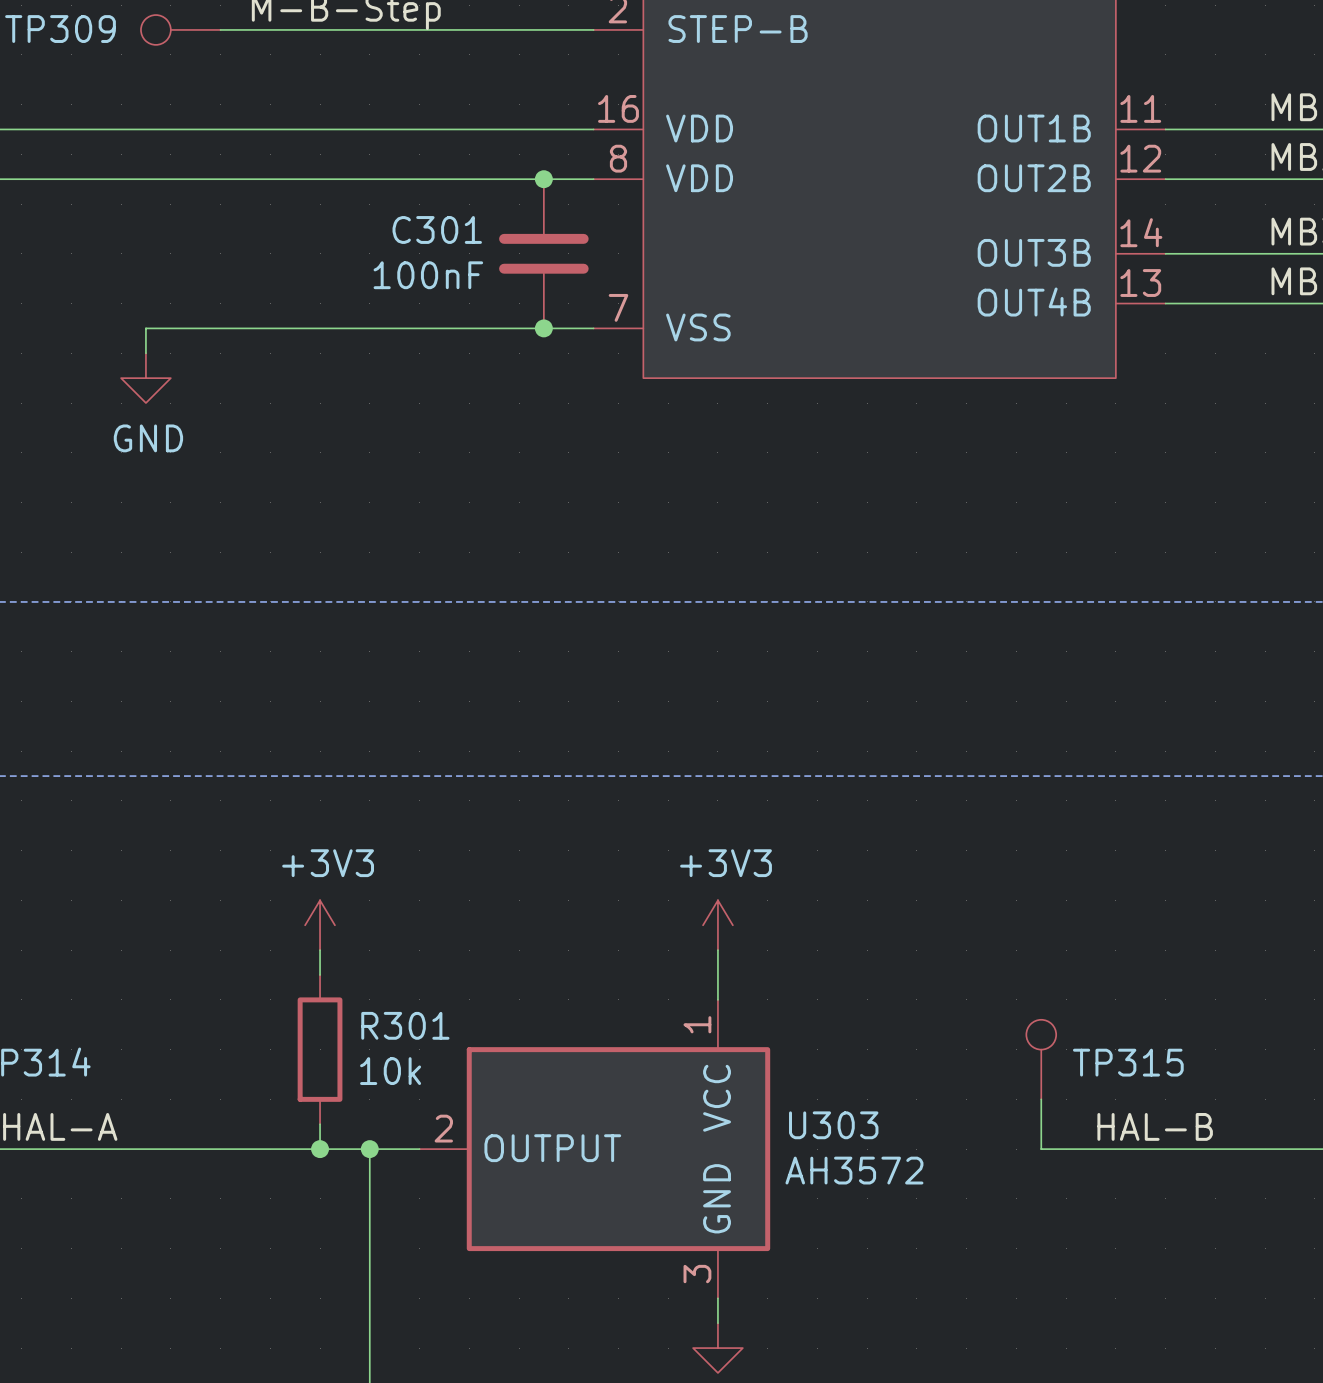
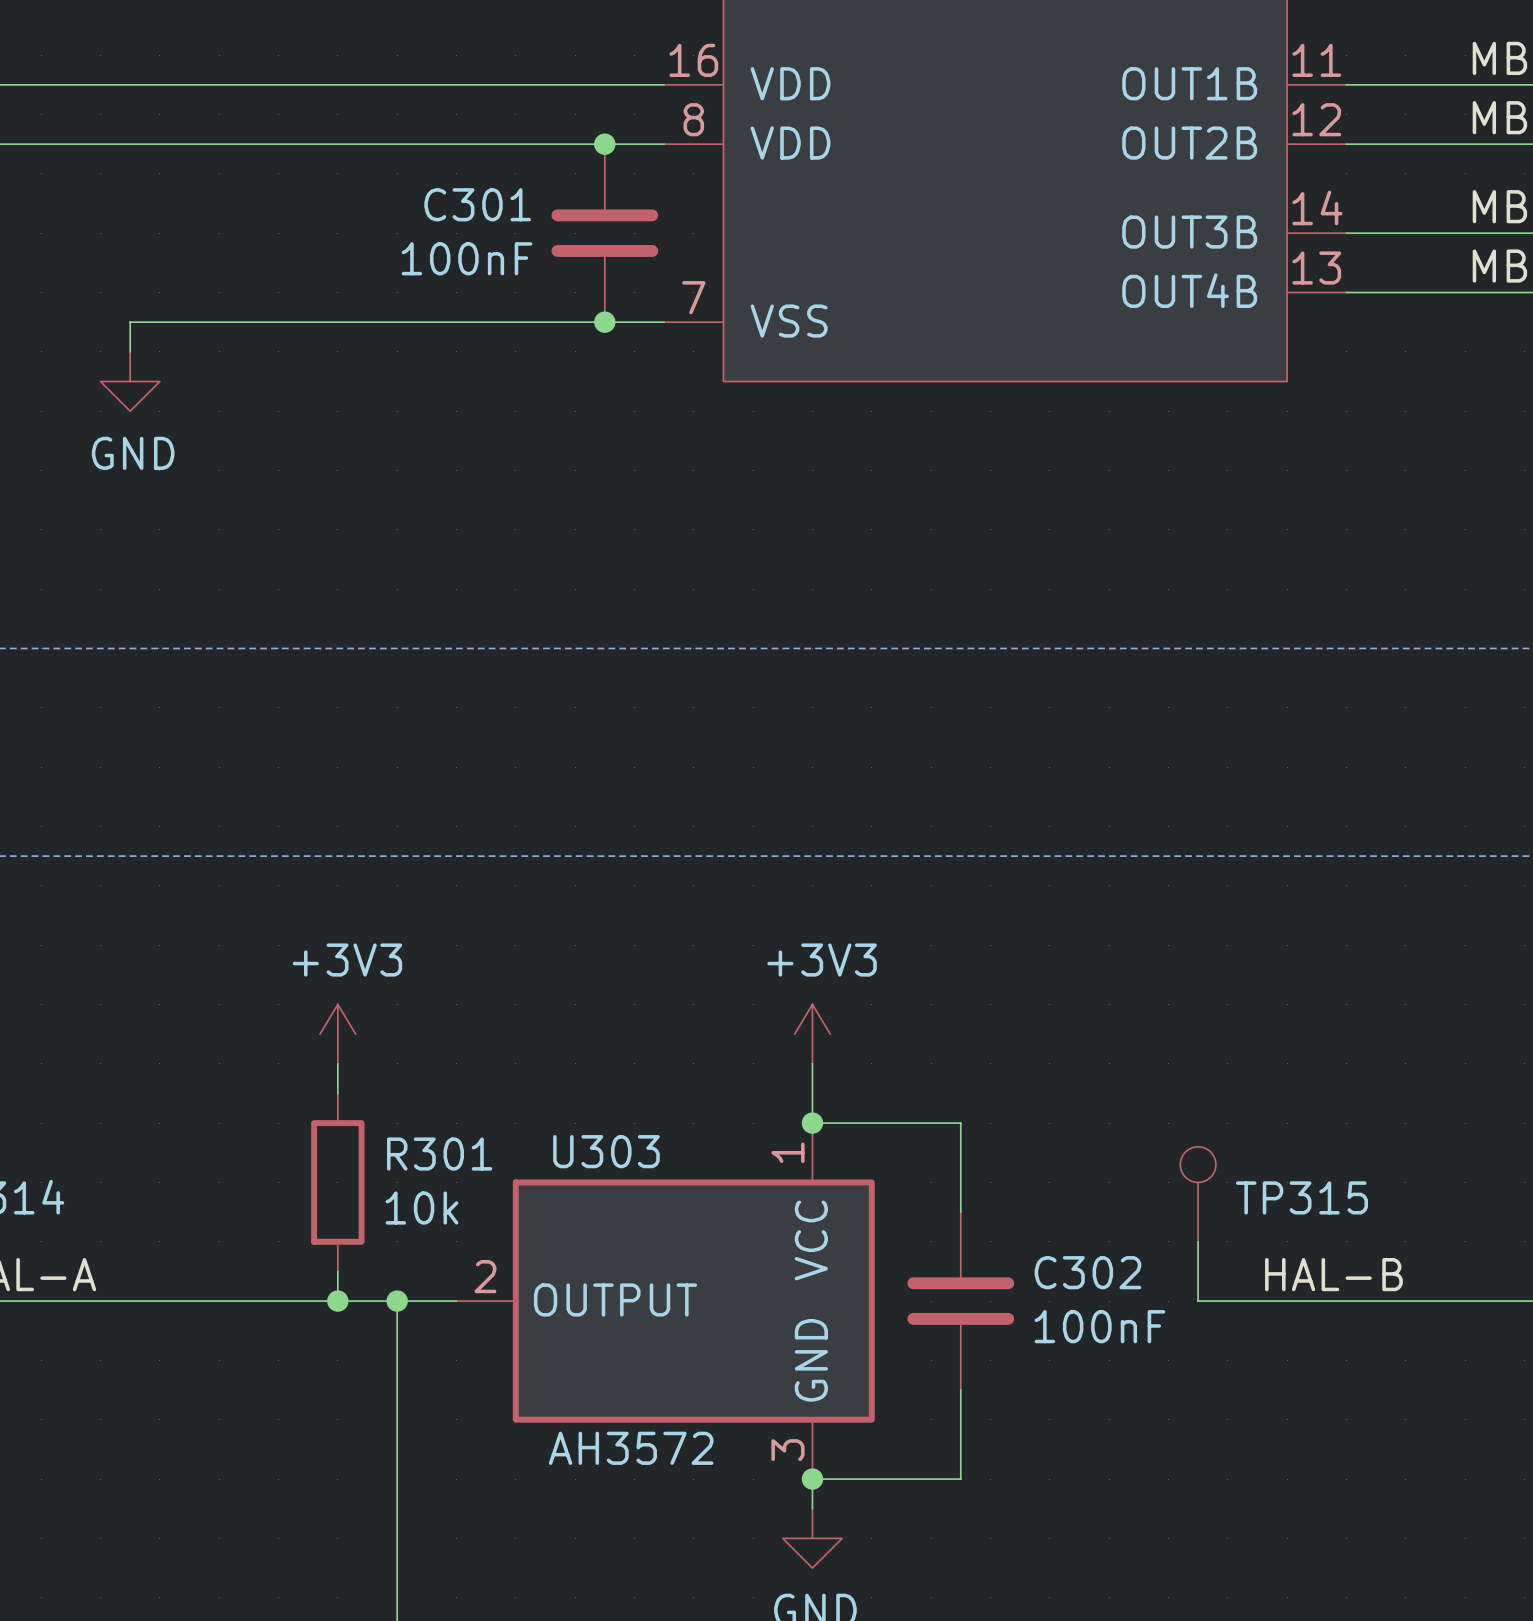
wire: none -> (812, 1123) (960, 1123) (960, 1212)
junction: none -> (812, 1123)
U303 name position: U303 (833, 1125) -> U303 (606, 1151)
C302: none -> 100nF (960, 1301)
U303 value position: AH3572 (854, 1170) -> AH3572 (631, 1448)
wire: none -> (960, 1390) (960, 1479) (812, 1479)
junction: none -> (812, 1479)

